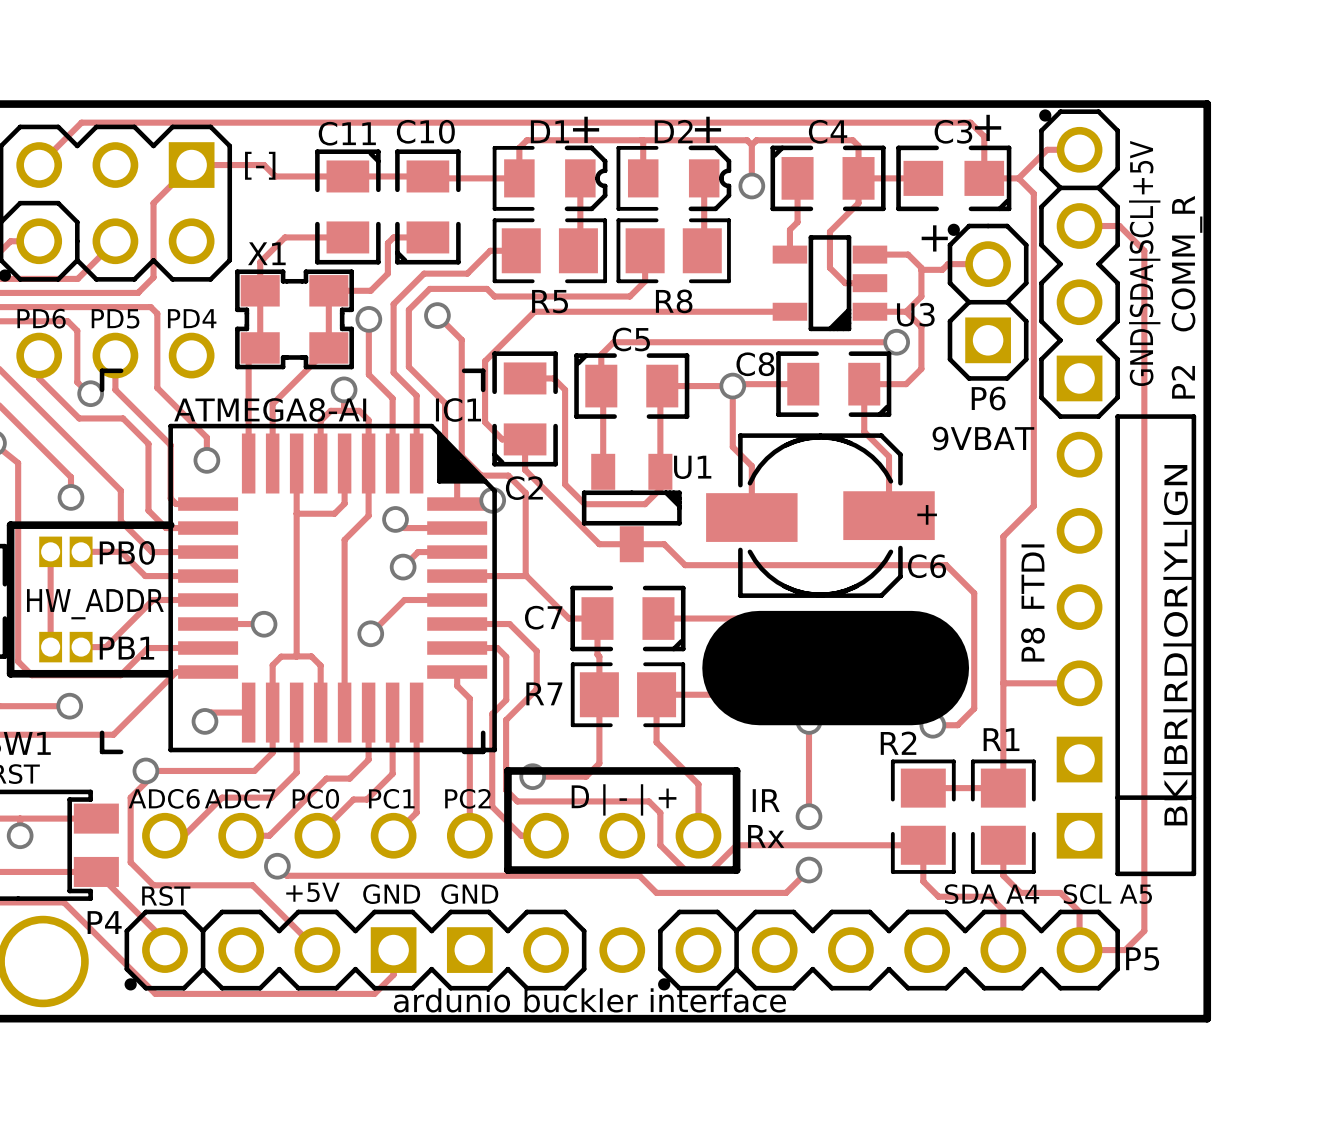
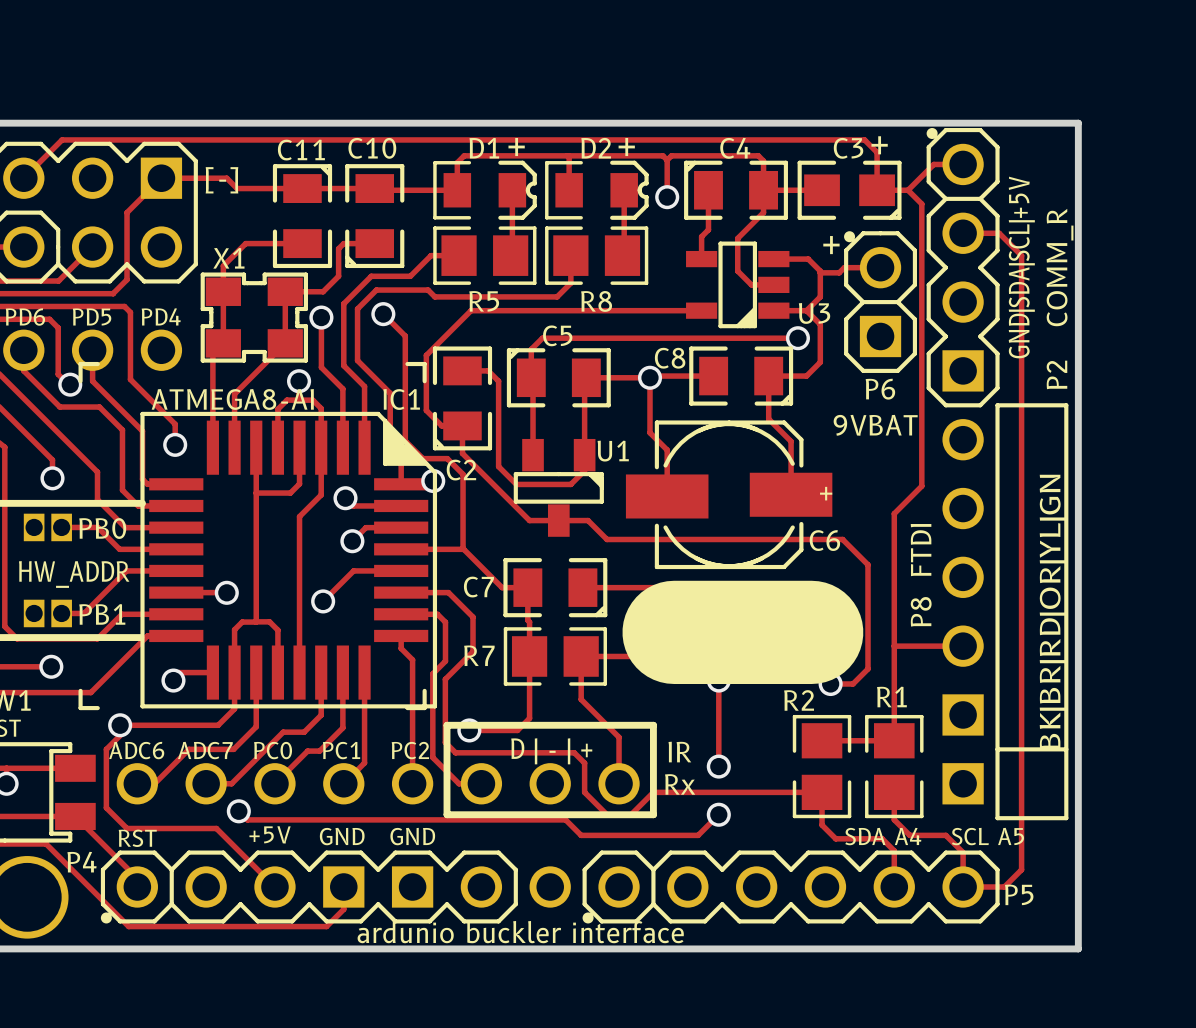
track: (50, 551) (50, 647) -> none

